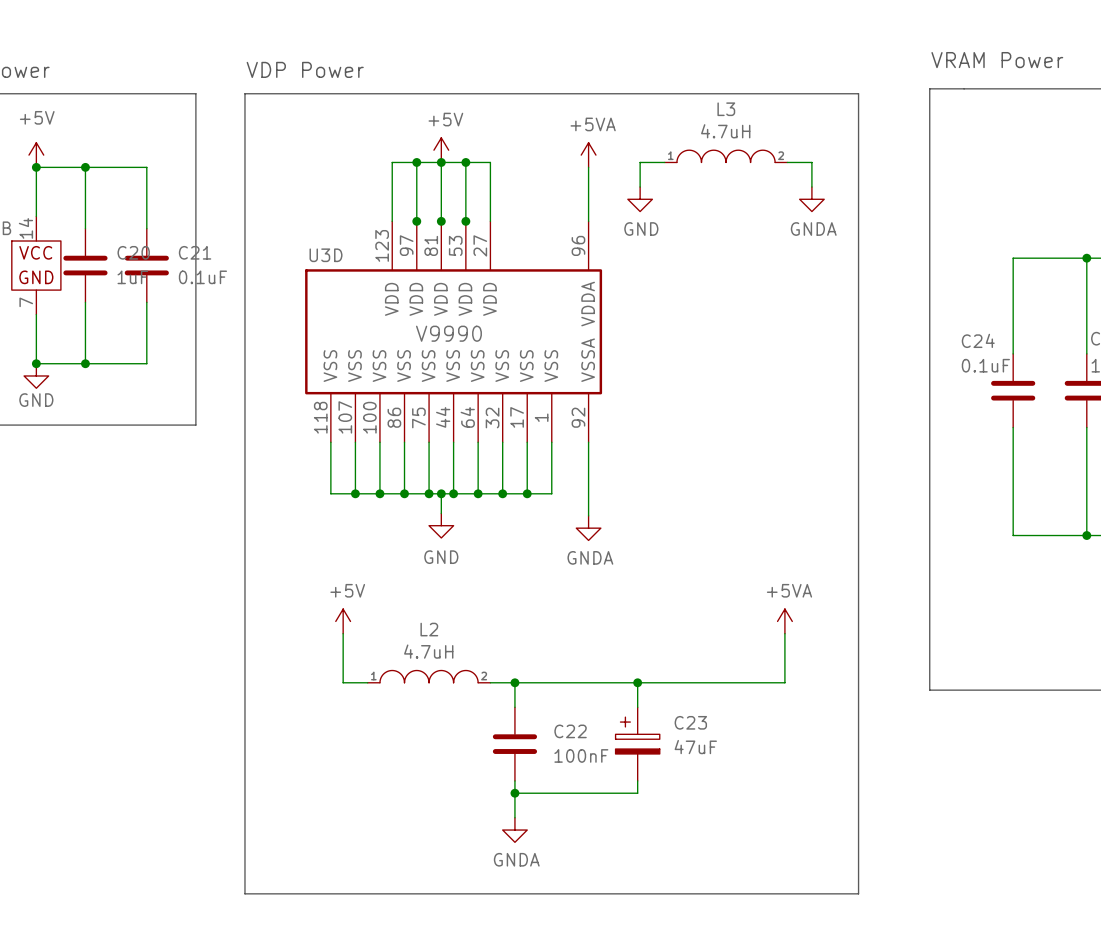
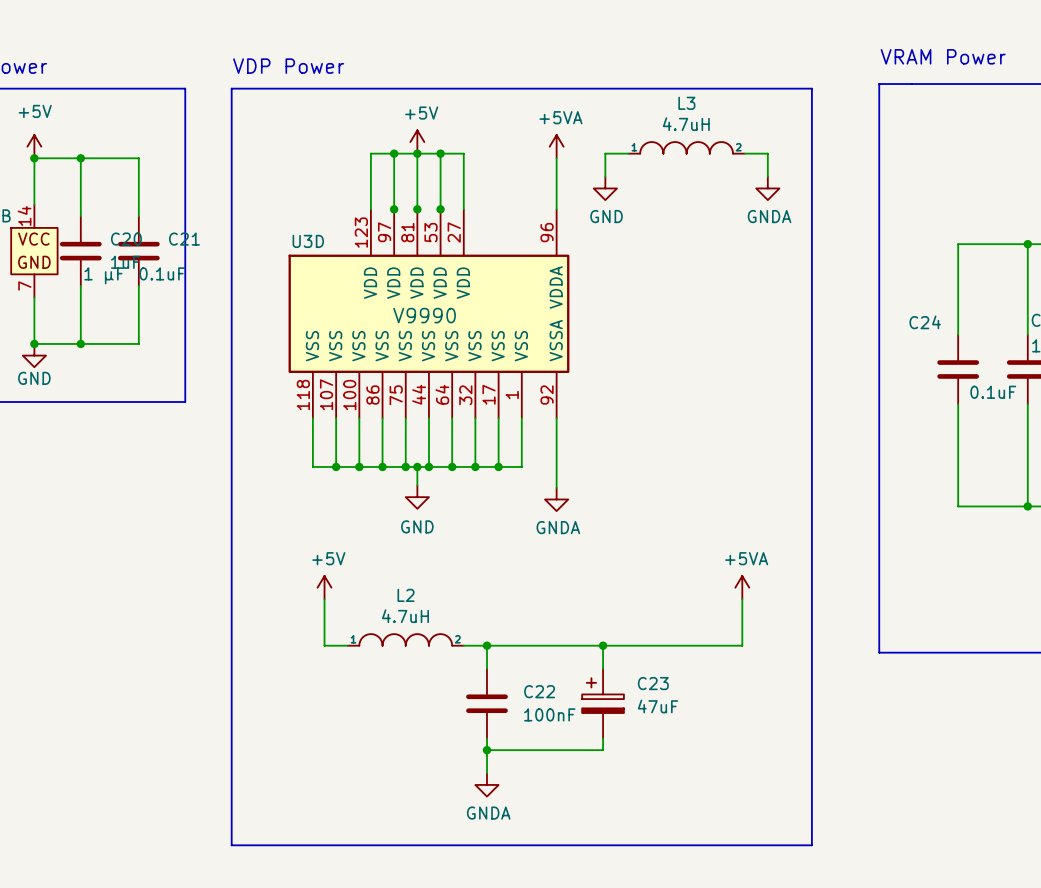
C21 value: 0.1uF (202, 277) -> none
C21 text: none -> 0.1uF (162, 273)
C20 text: none -> 1 µF (104, 275)
C24 value: 0.1uF (985, 365) -> none
C24 text: none -> 0.1uF (993, 392)

